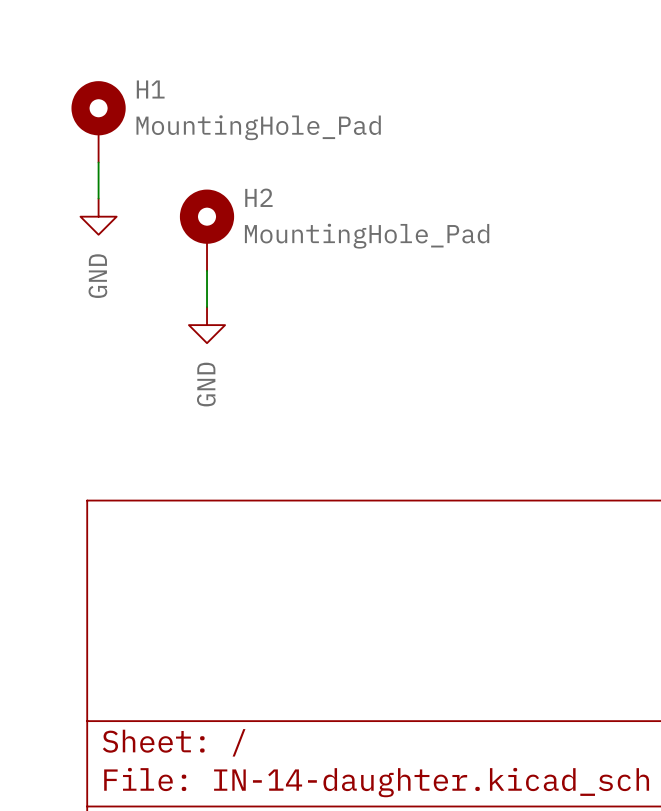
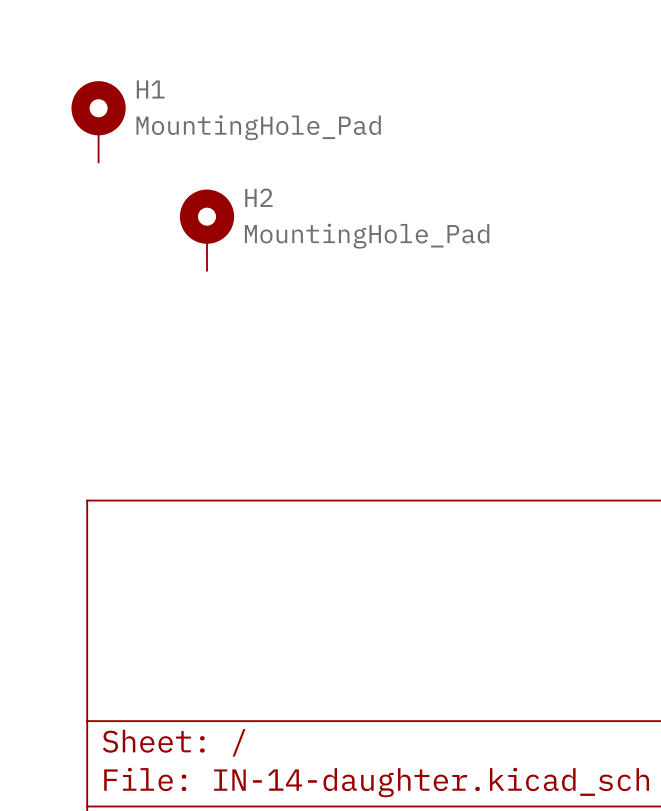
wire: (98, 162) (98, 198) -> none
power symbol: GND (98, 216) -> none
wire: (207, 270) (207, 307) -> none
power symbol: GND (207, 325) -> none

